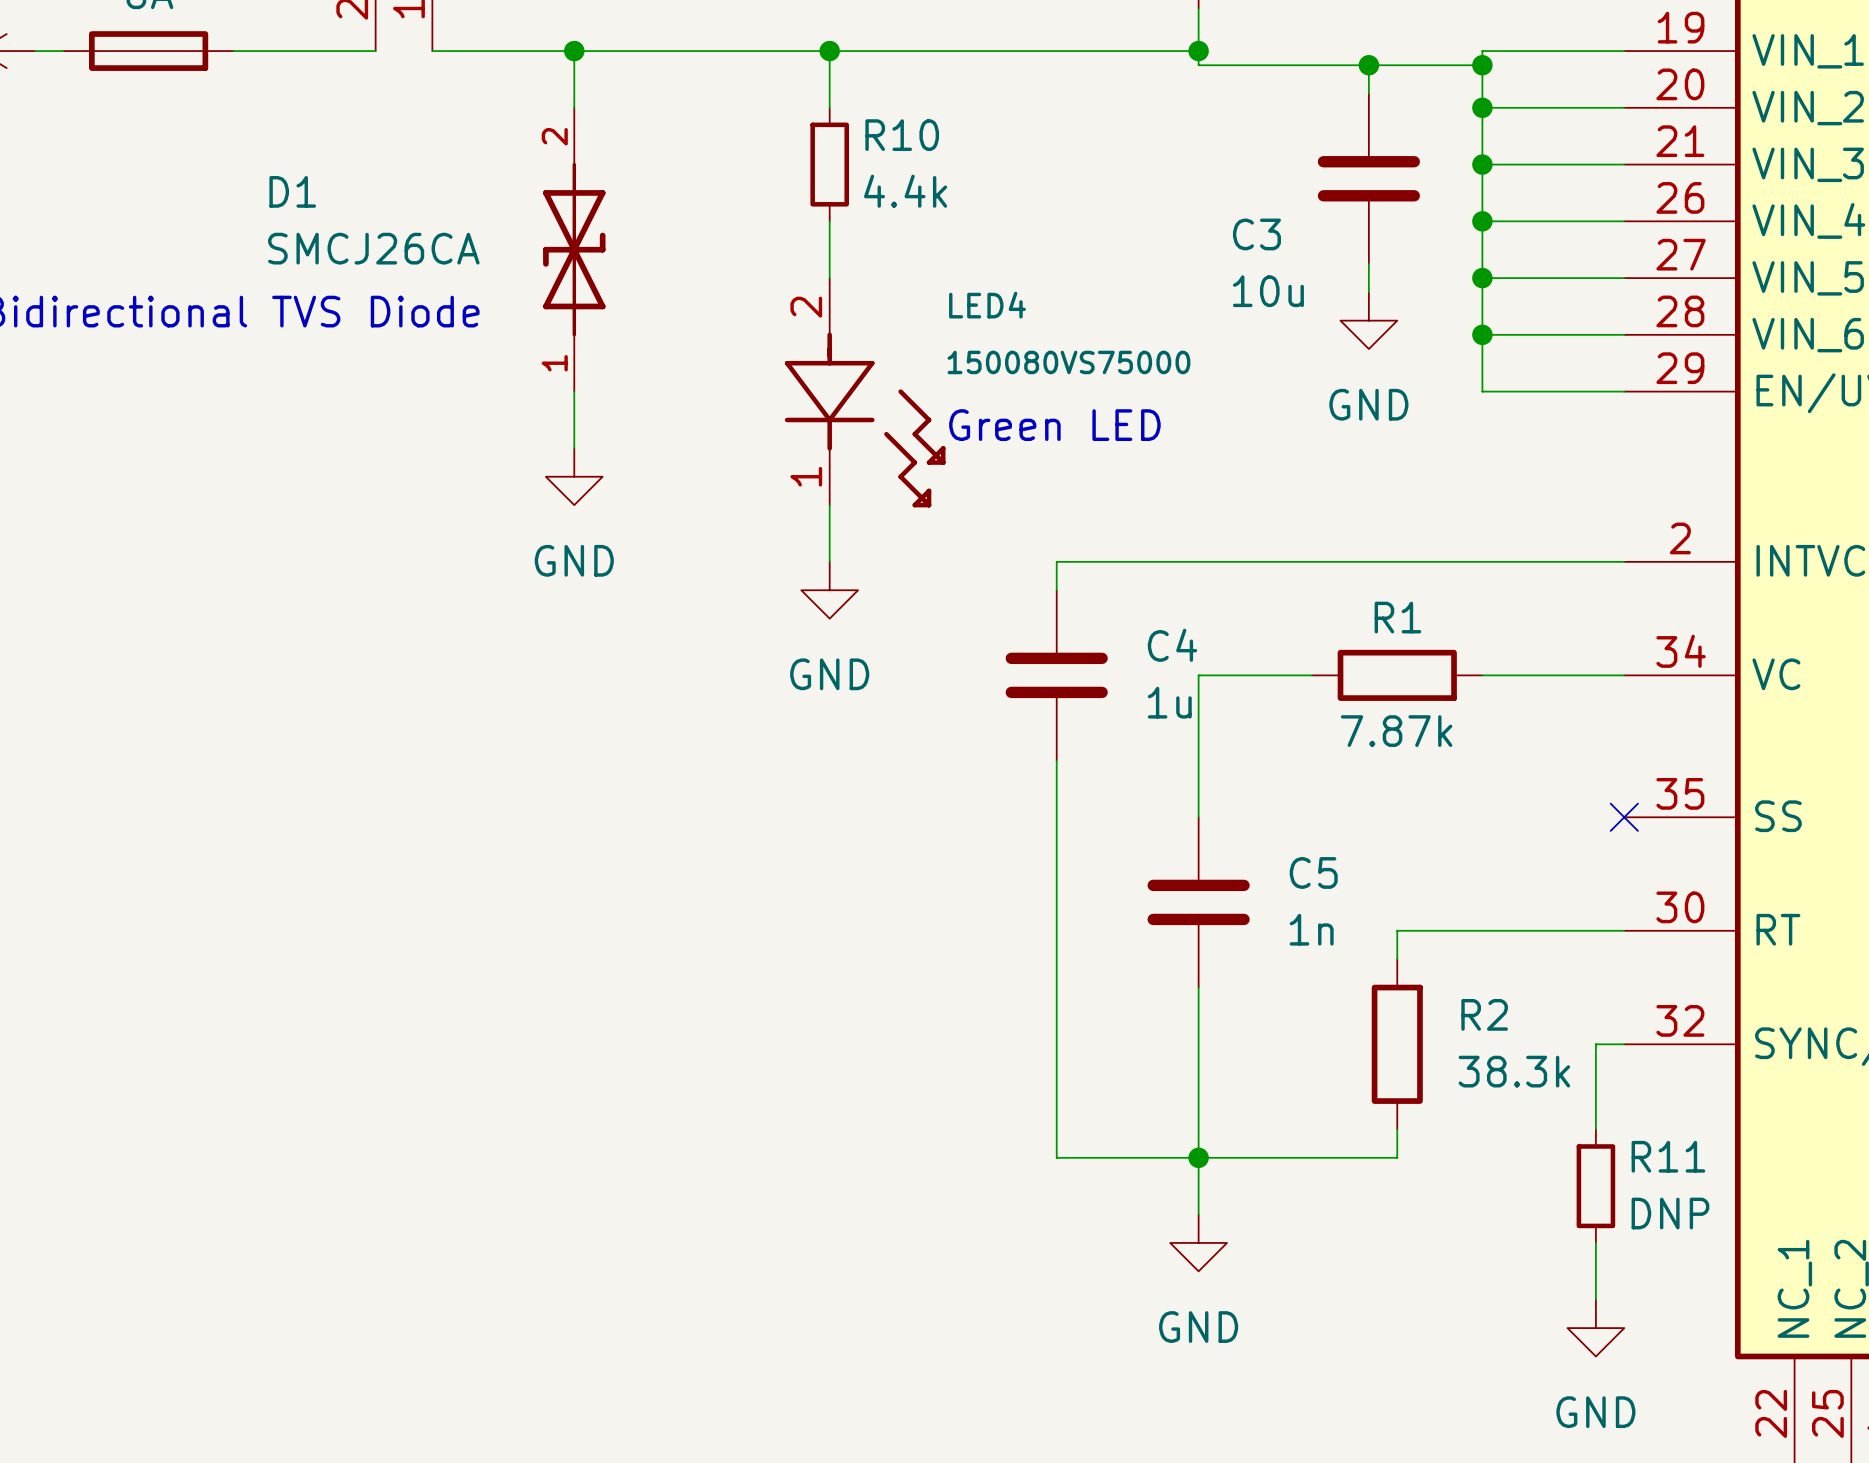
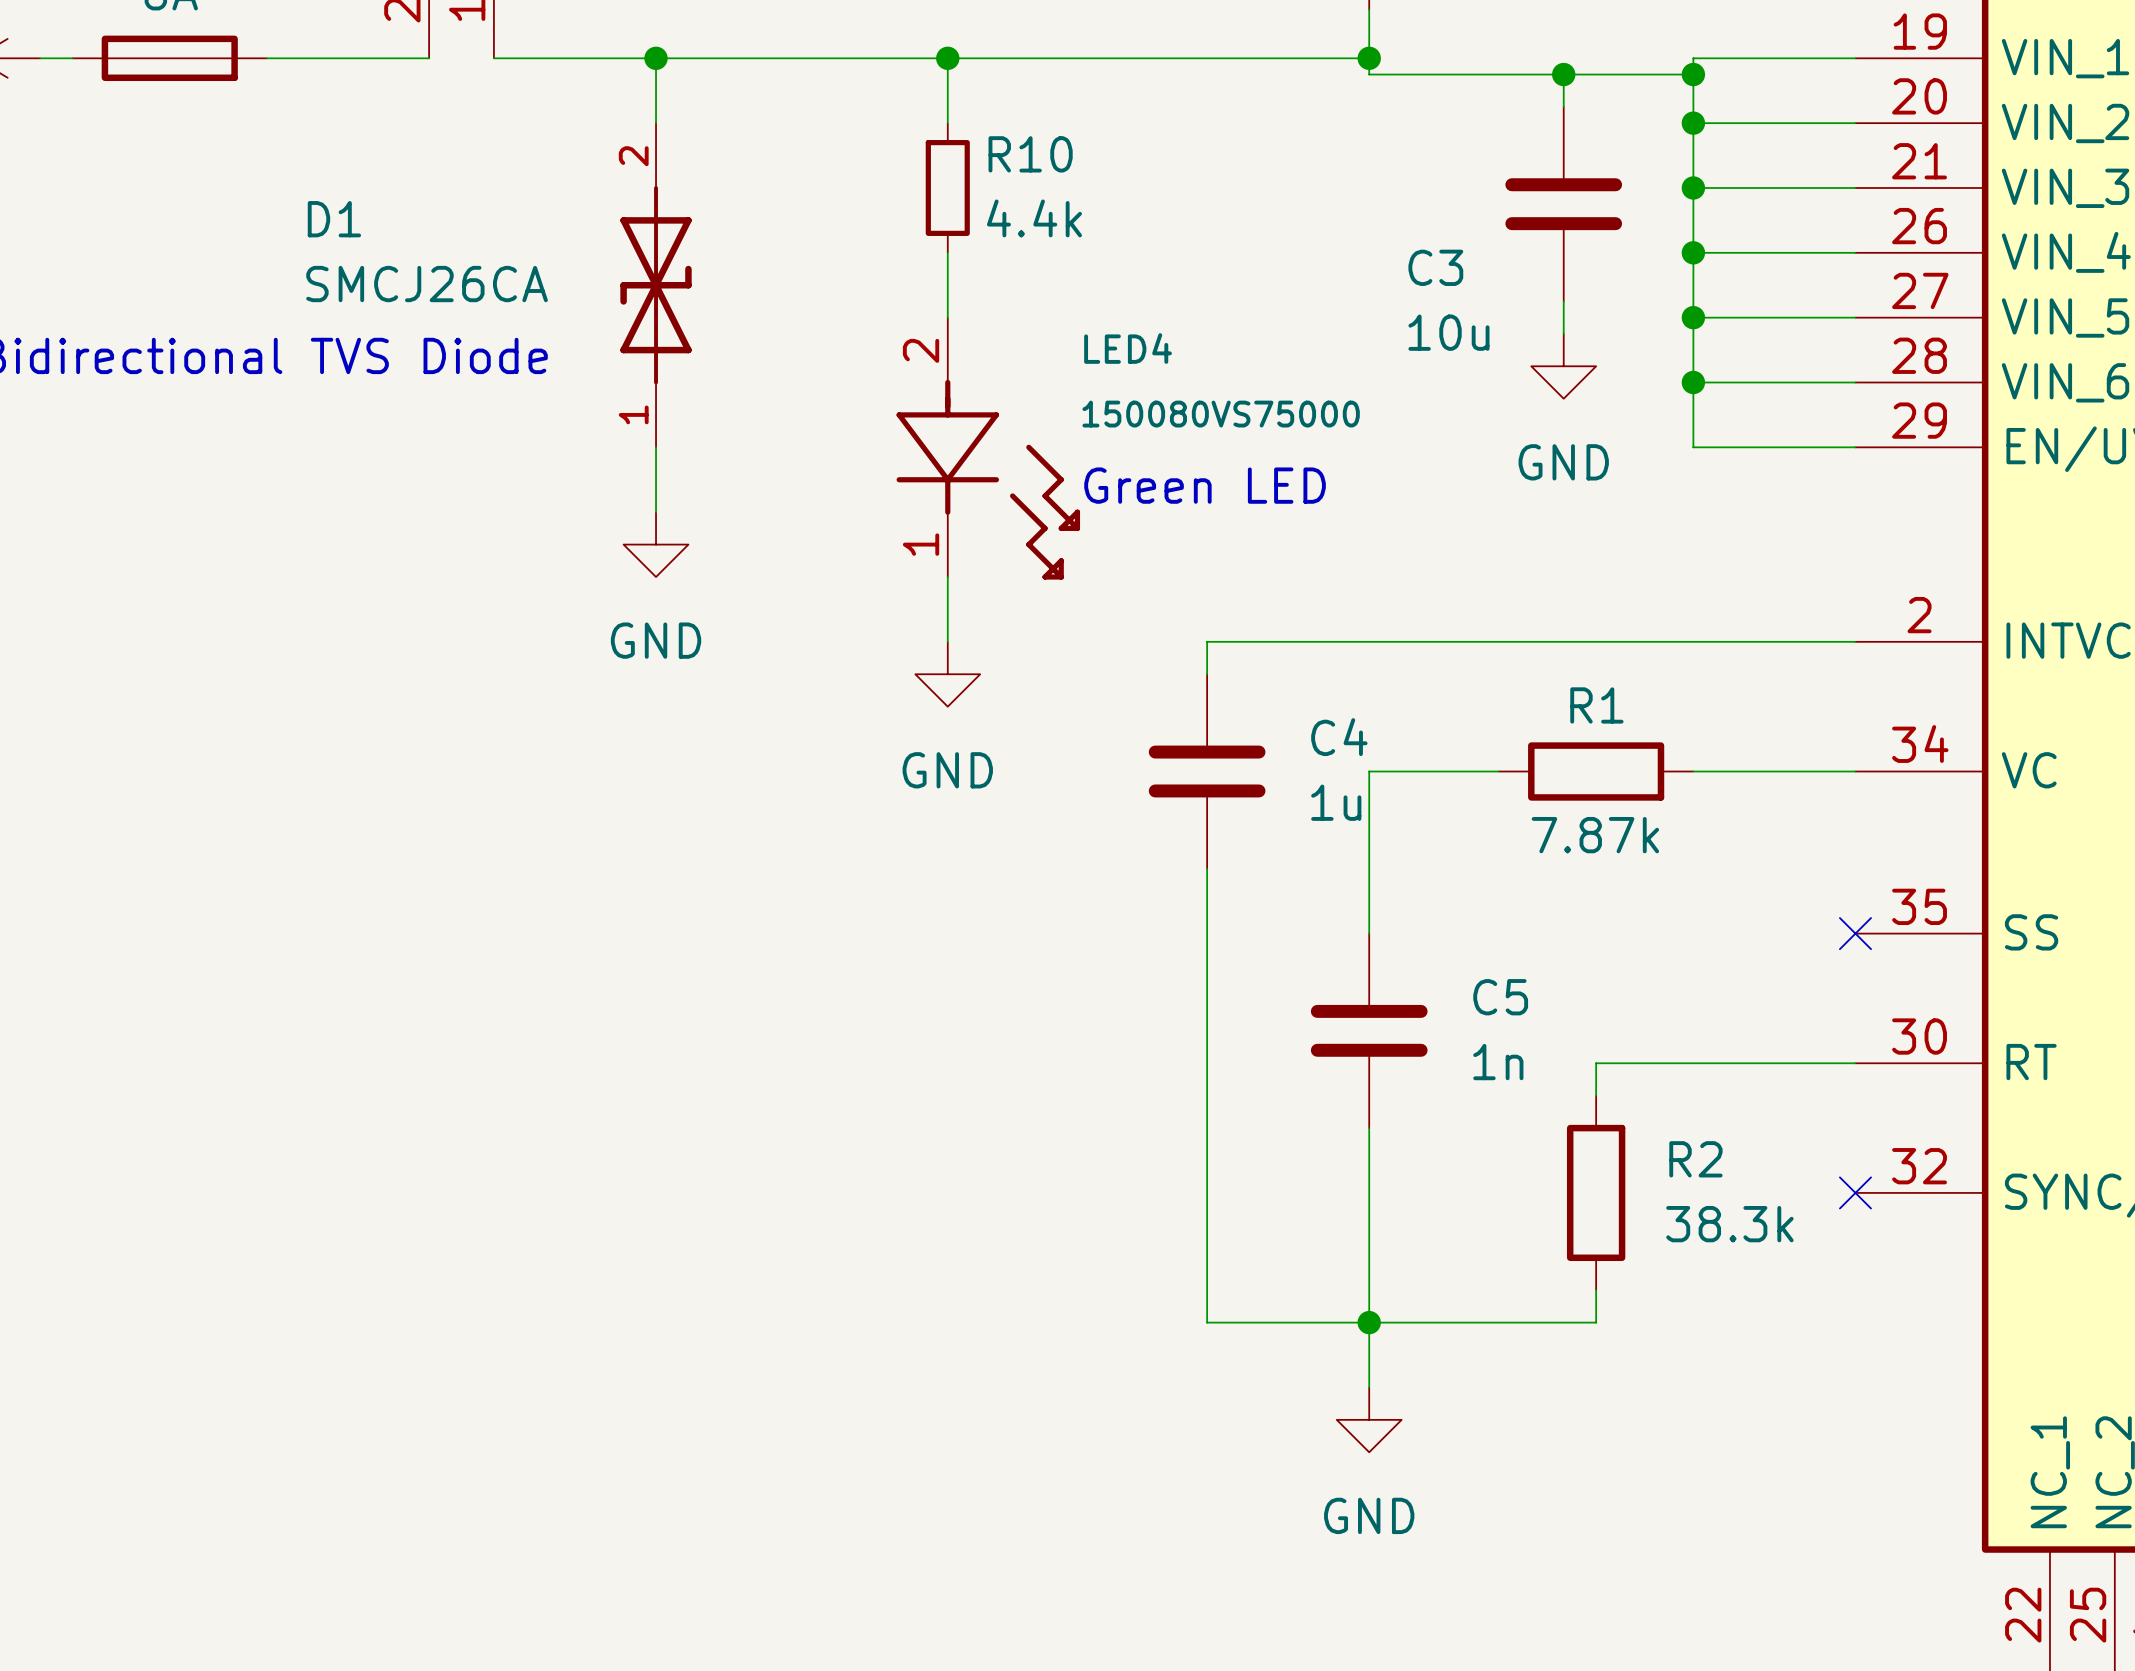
wire: (1624, 1044) (1595, 1044) (1595, 1129) -> none
no-connect mark: none -> (1855, 1192)
R11: DNP (1595, 1186) -> none
wire: (1595, 1242) (1595, 1299) -> none
power symbol: GND (1595, 1328) -> none

